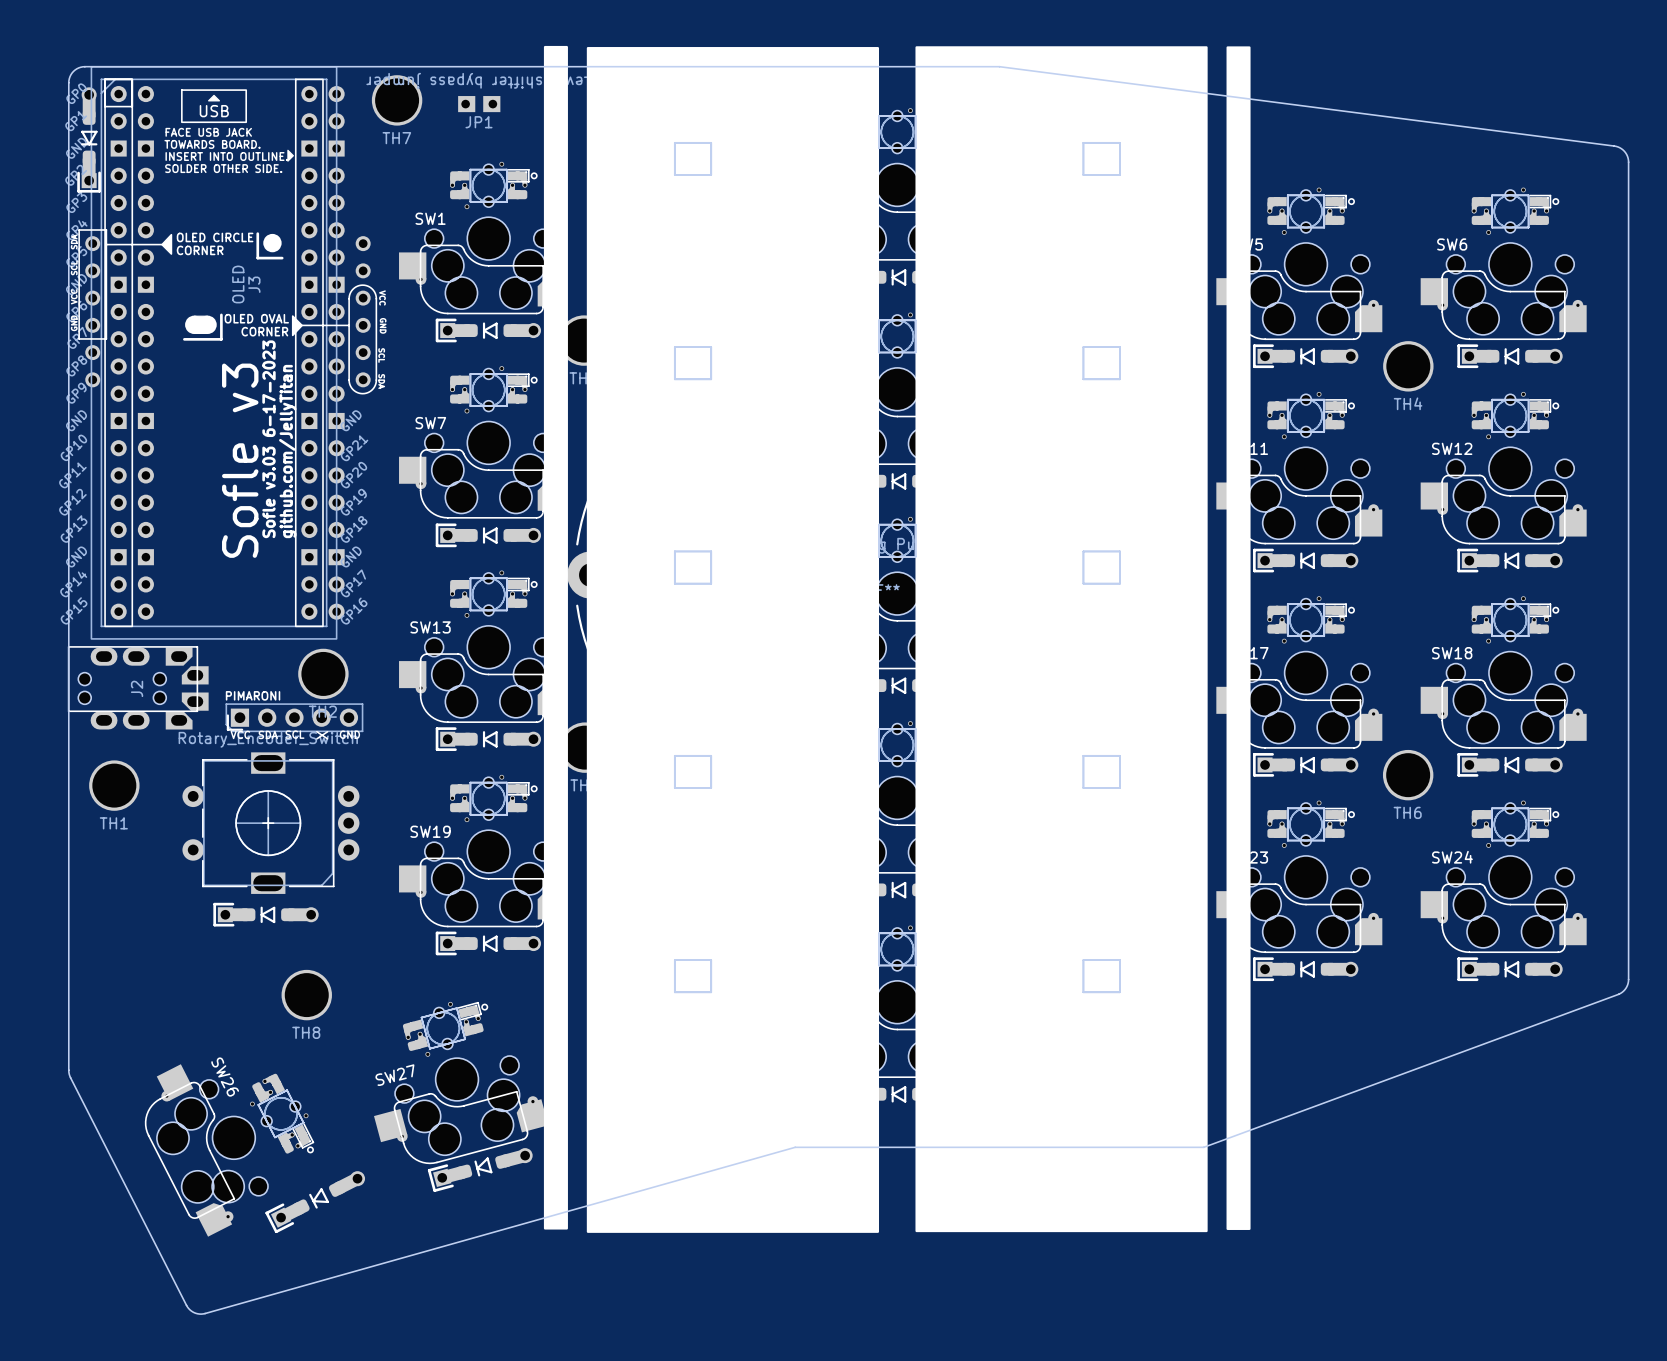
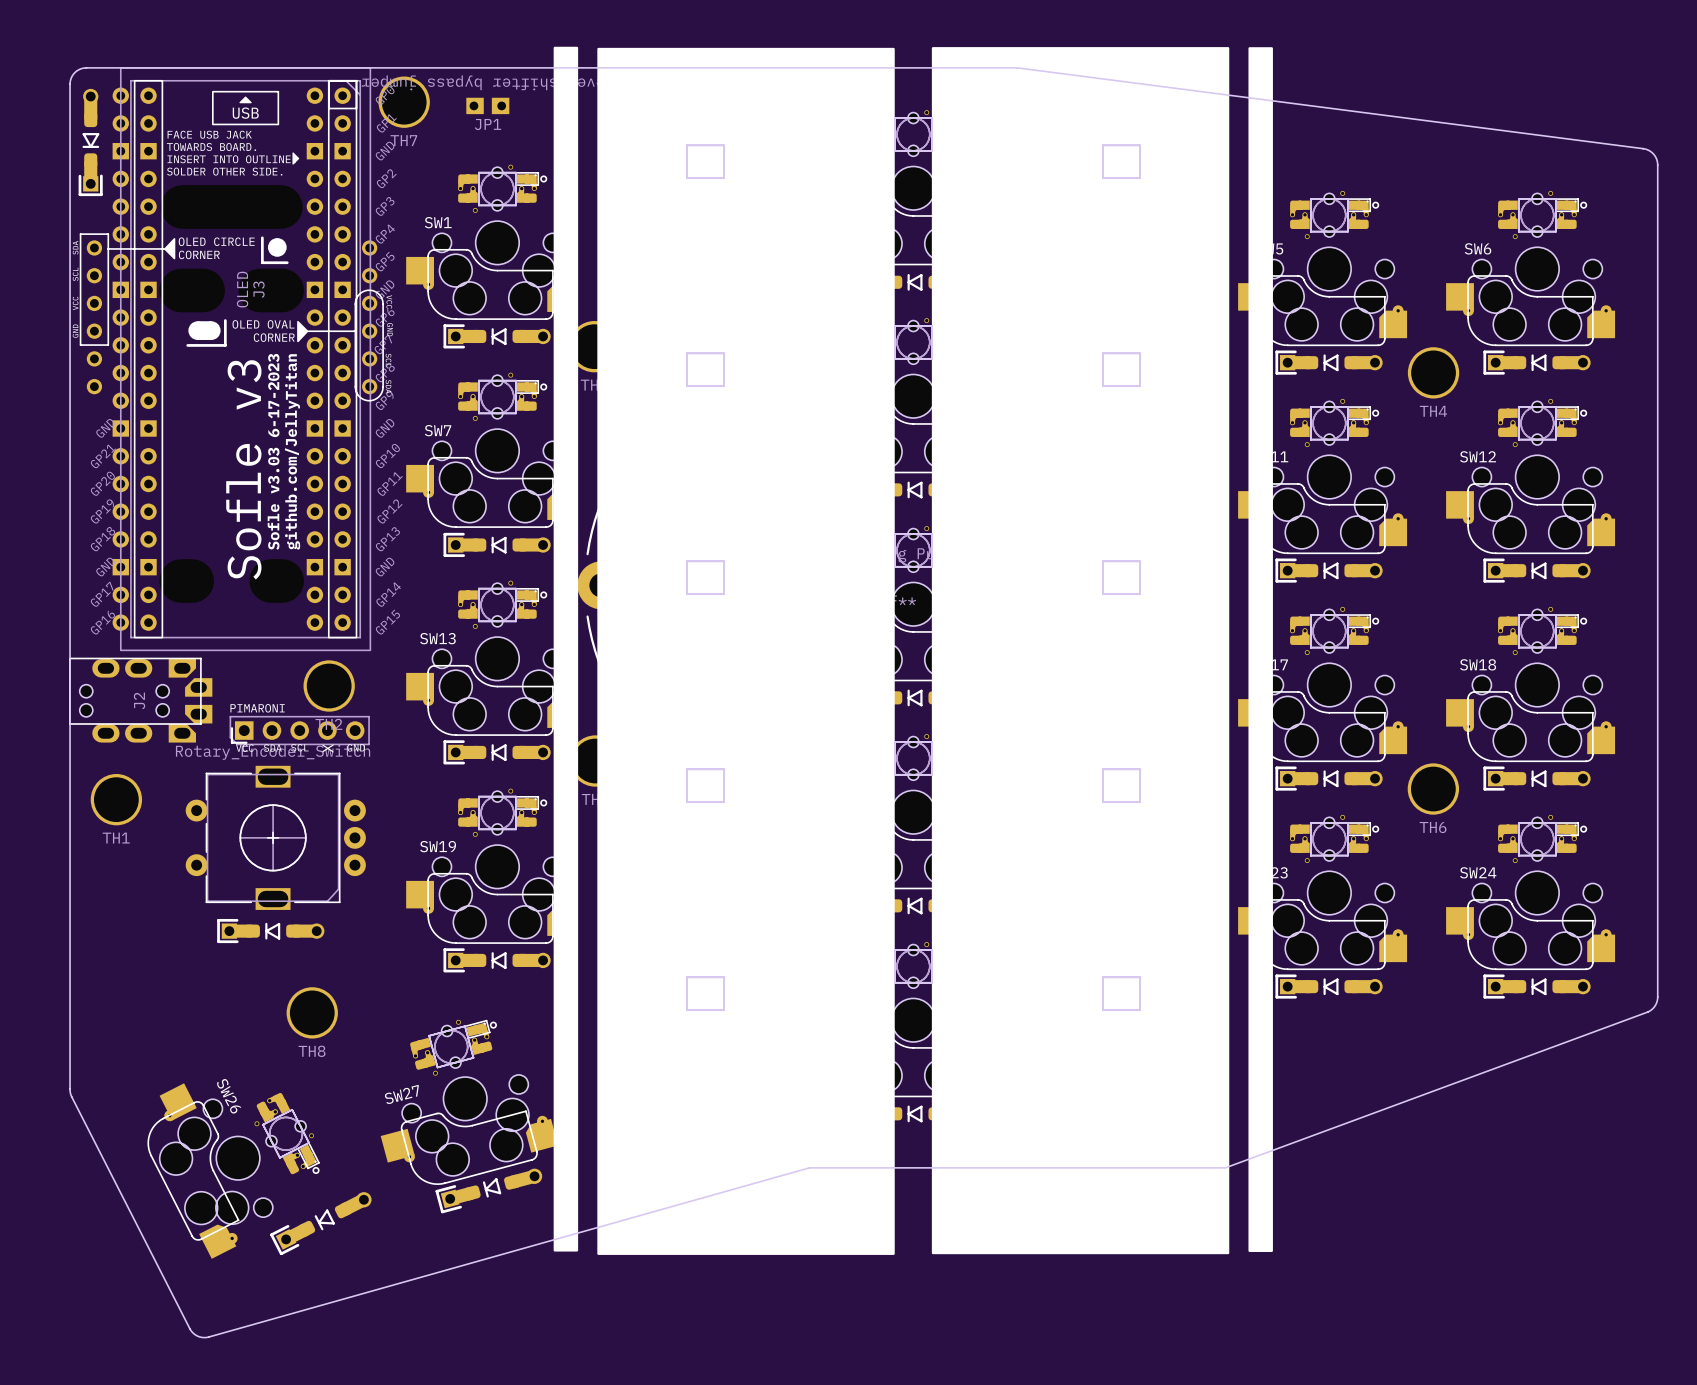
part: (217, 352) -> none
part: none -> (241, 359)

